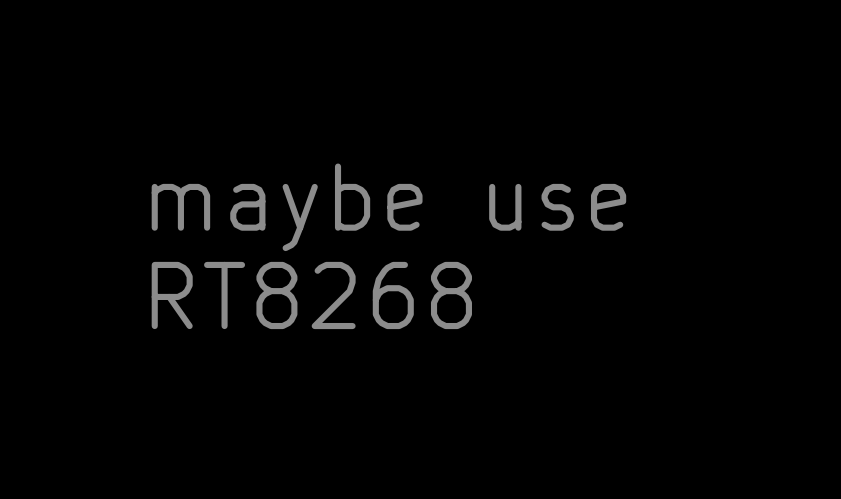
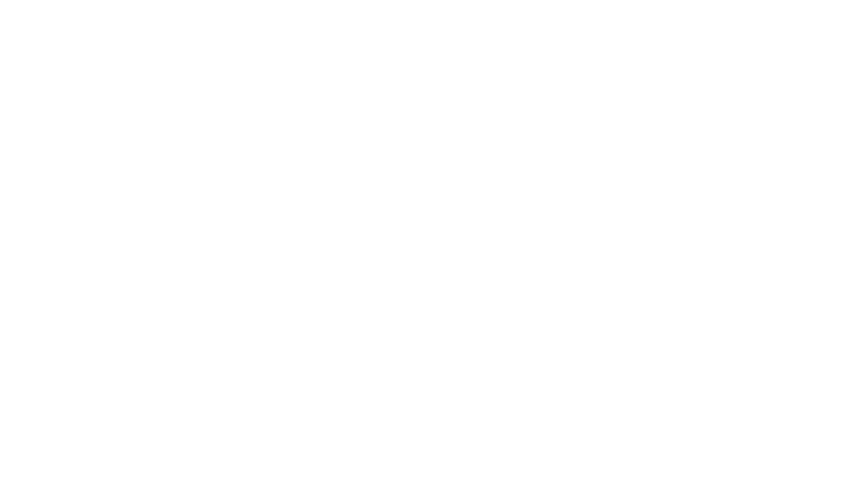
text: maybe use (388, 207) -> none
text: RT8268 (311, 295) -> none

